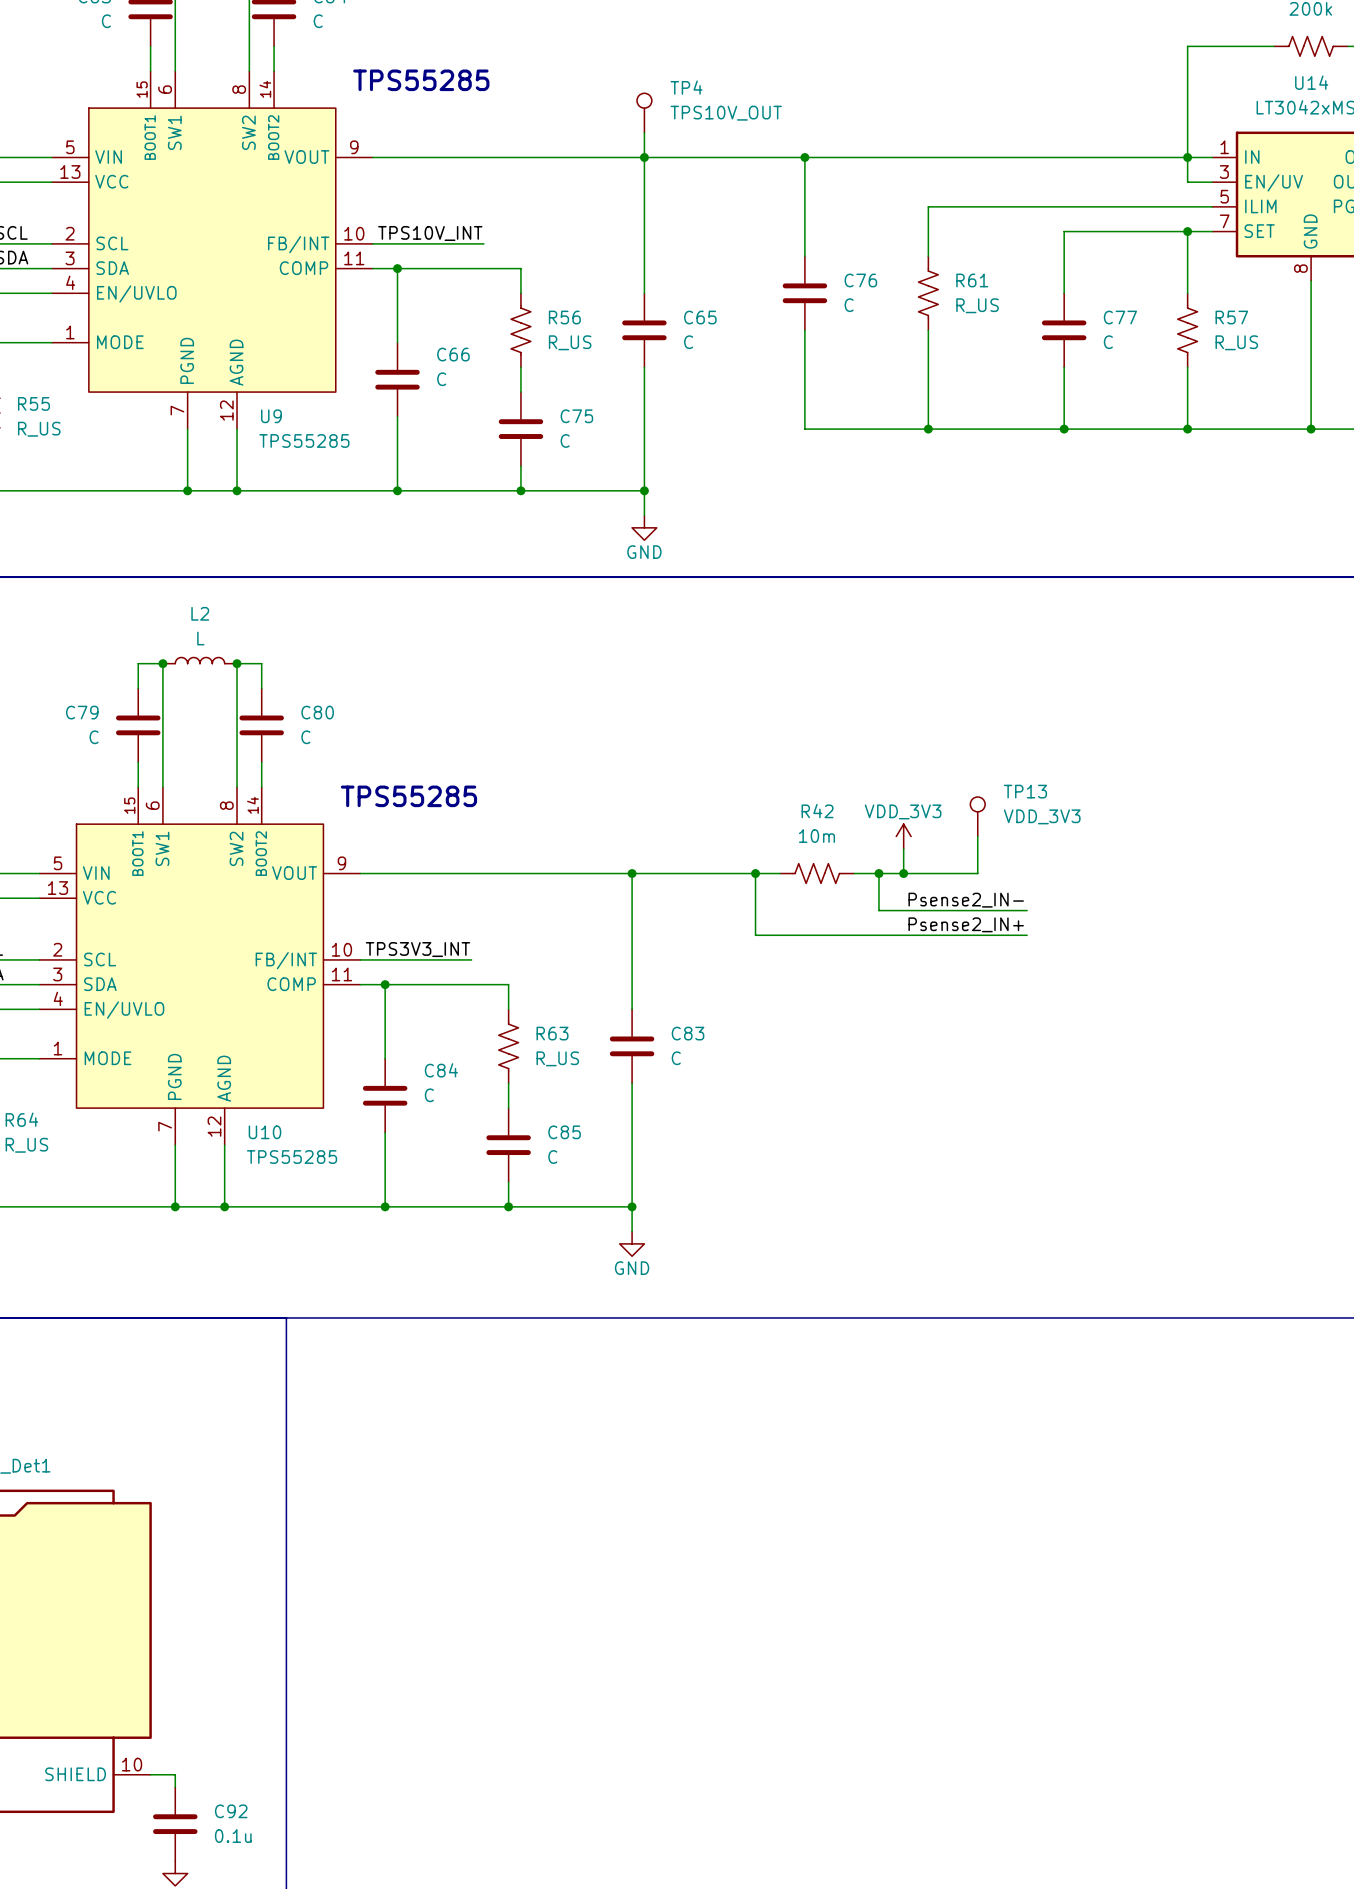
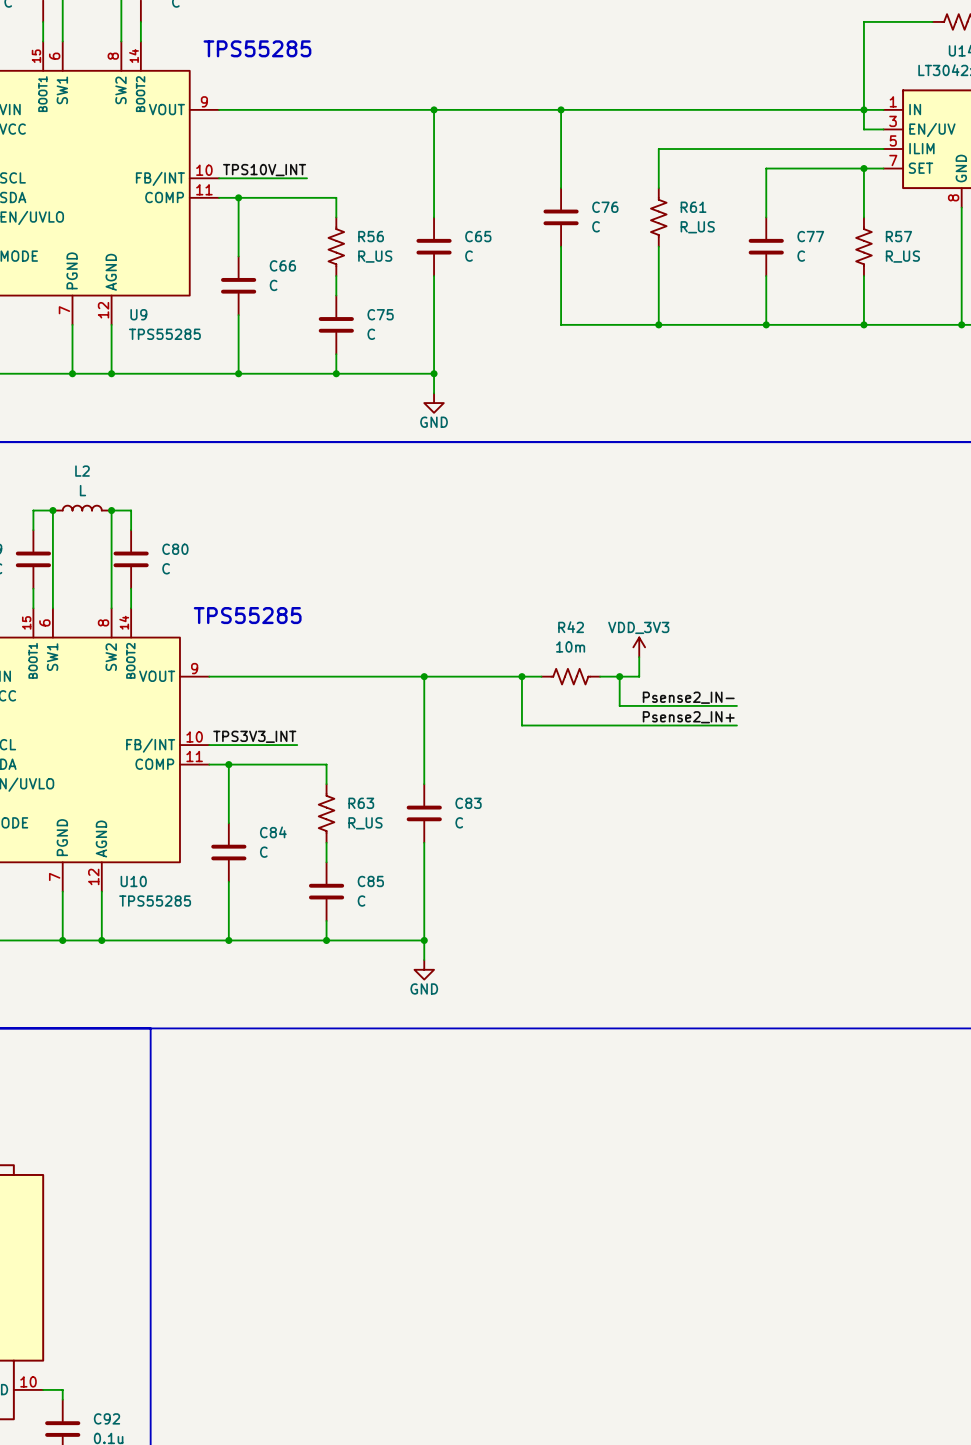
TP4: TPS10V_OUT (644, 113) -> none
wire: (644, 132) (644, 157) -> none
TP13: VDD_3V3 (977, 816) -> none
wire: (977, 836) (977, 873) (903, 873) -> none
junction: (903, 873) -> none

